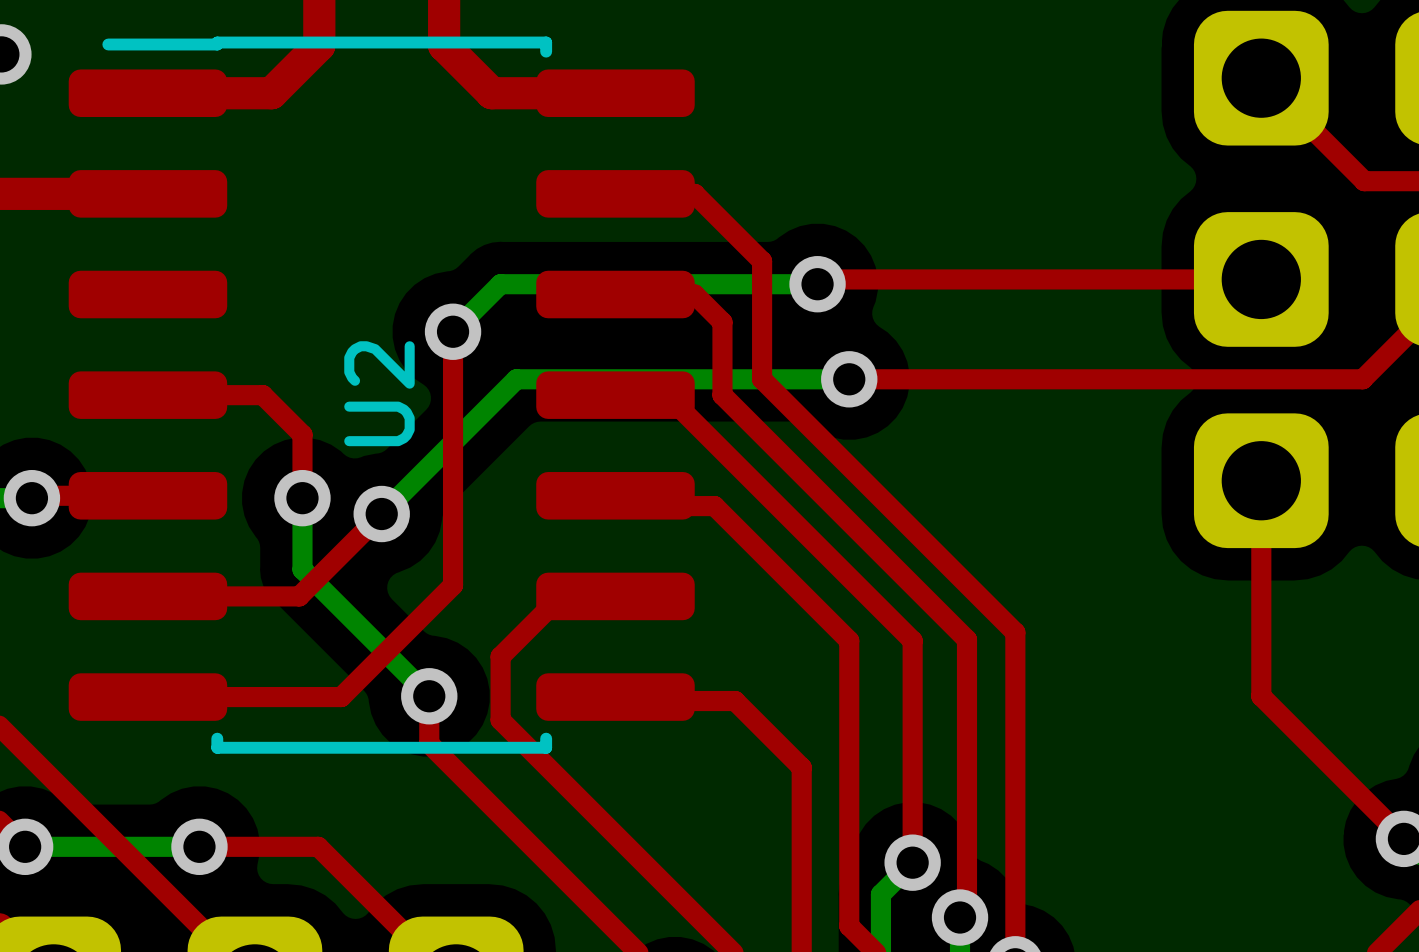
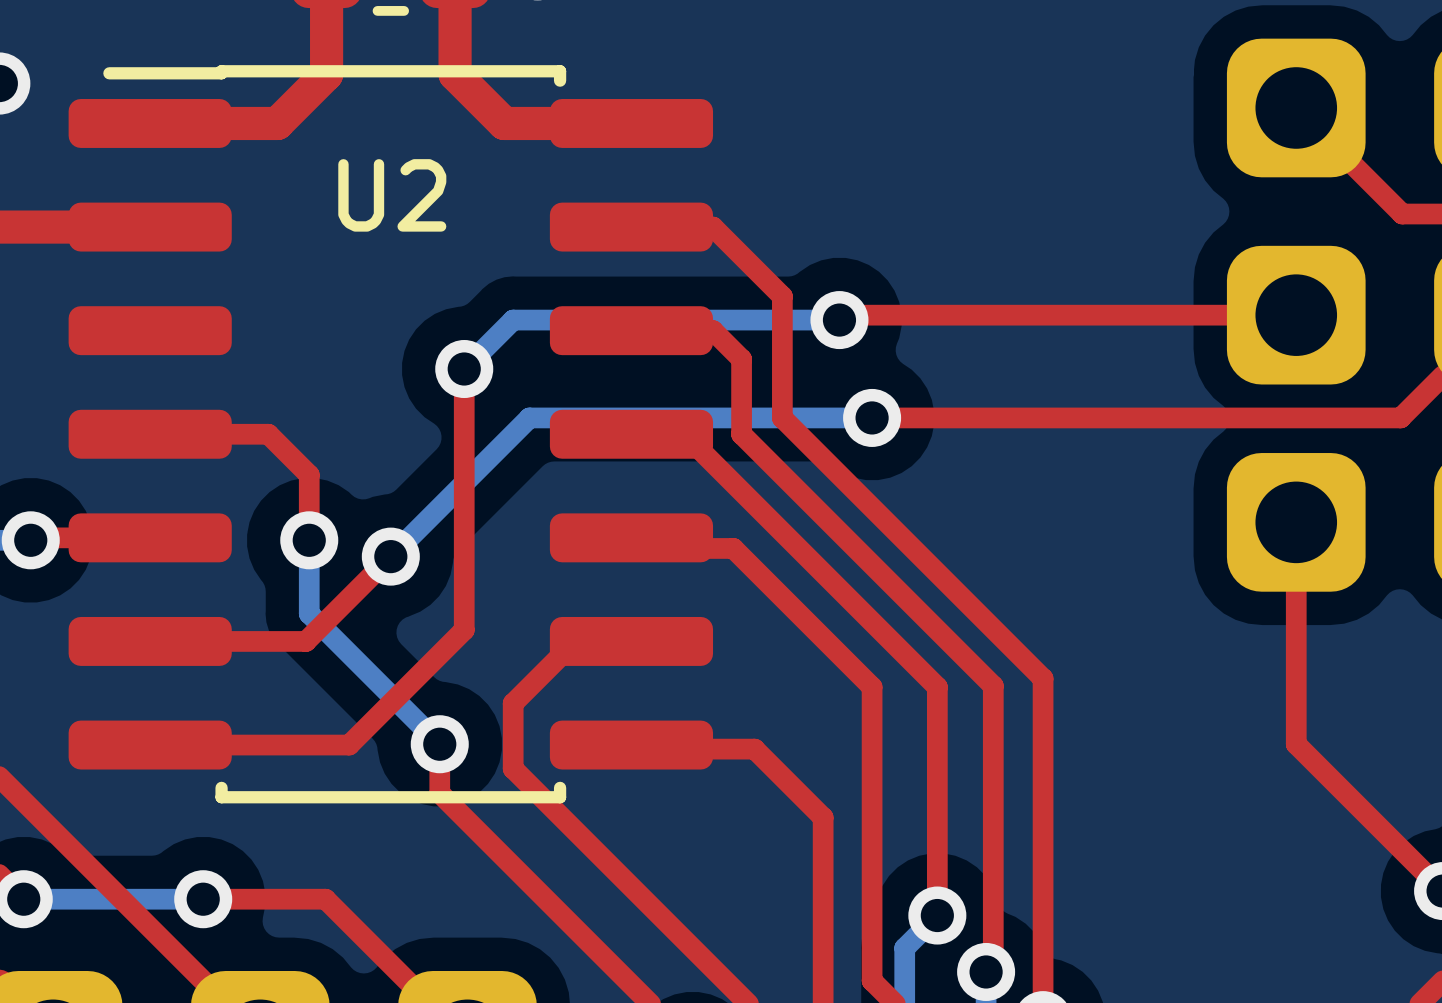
U2 name rotation: 0° (379, 393) -> 90° clockwise (392, 195)
U2 name position: U2 (379, 393) -> U2 (392, 195)

